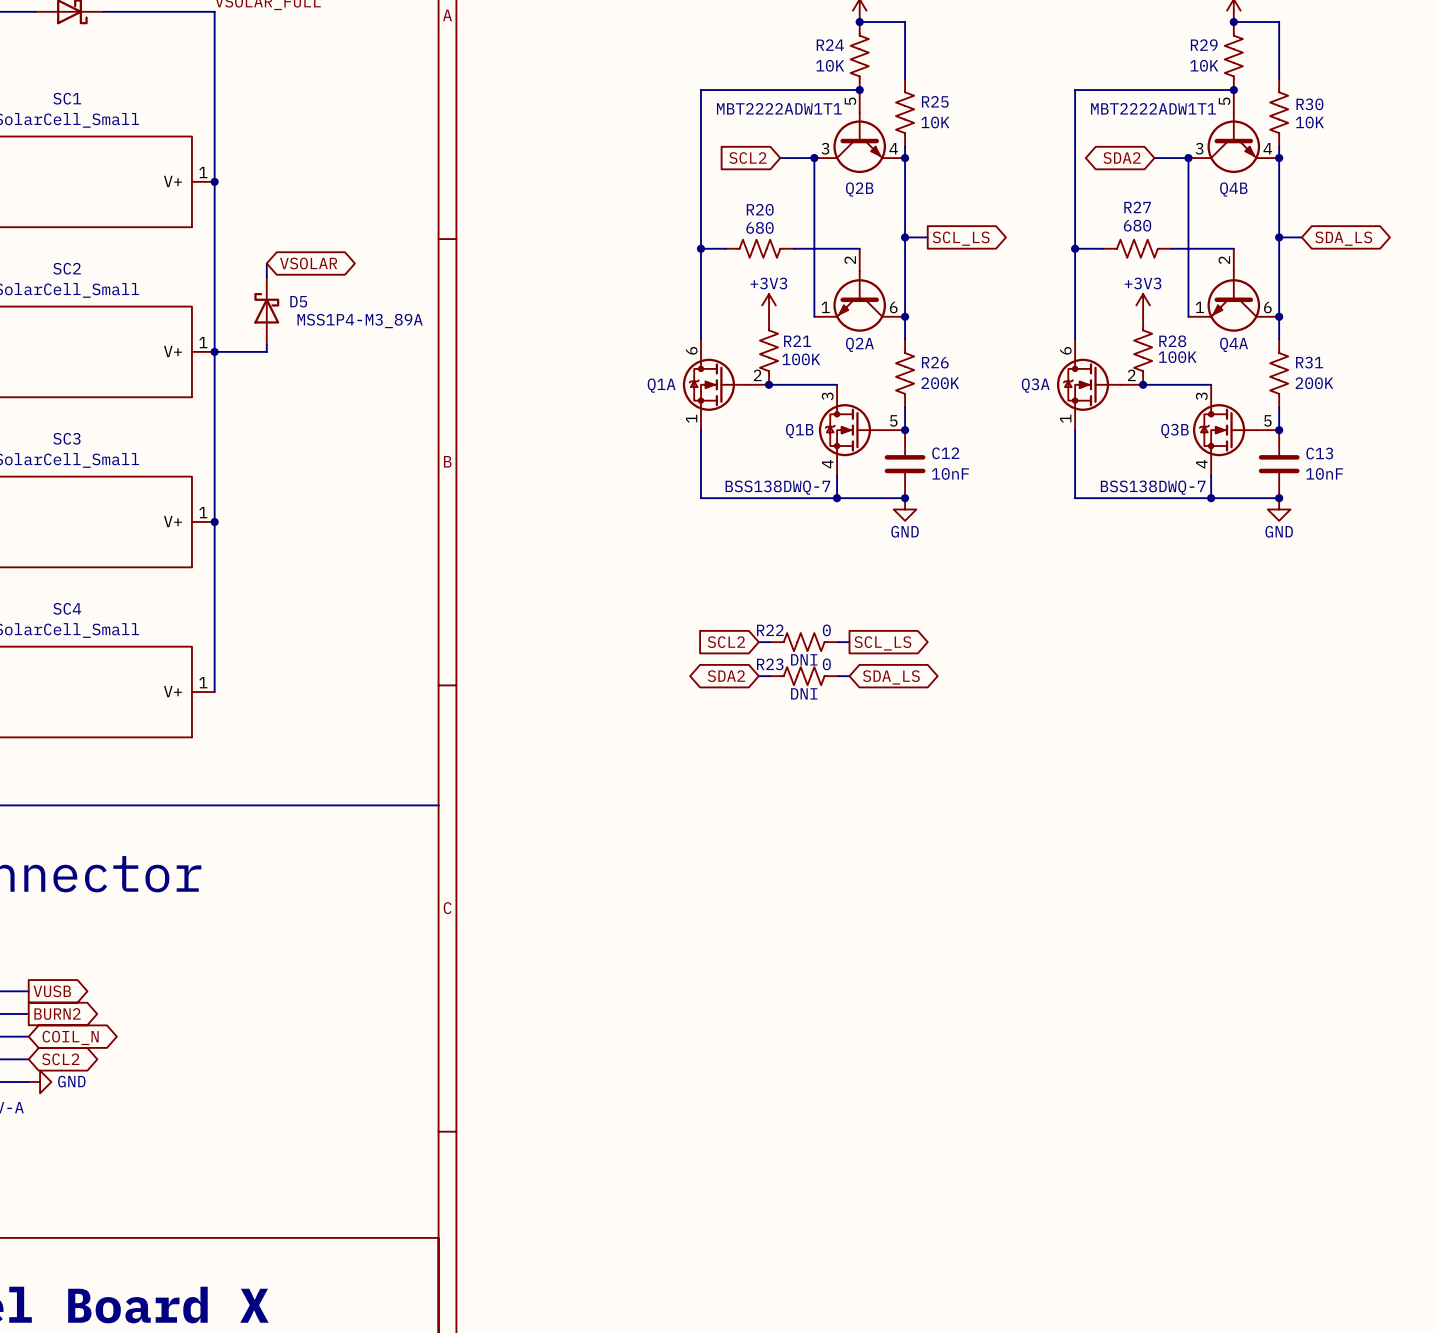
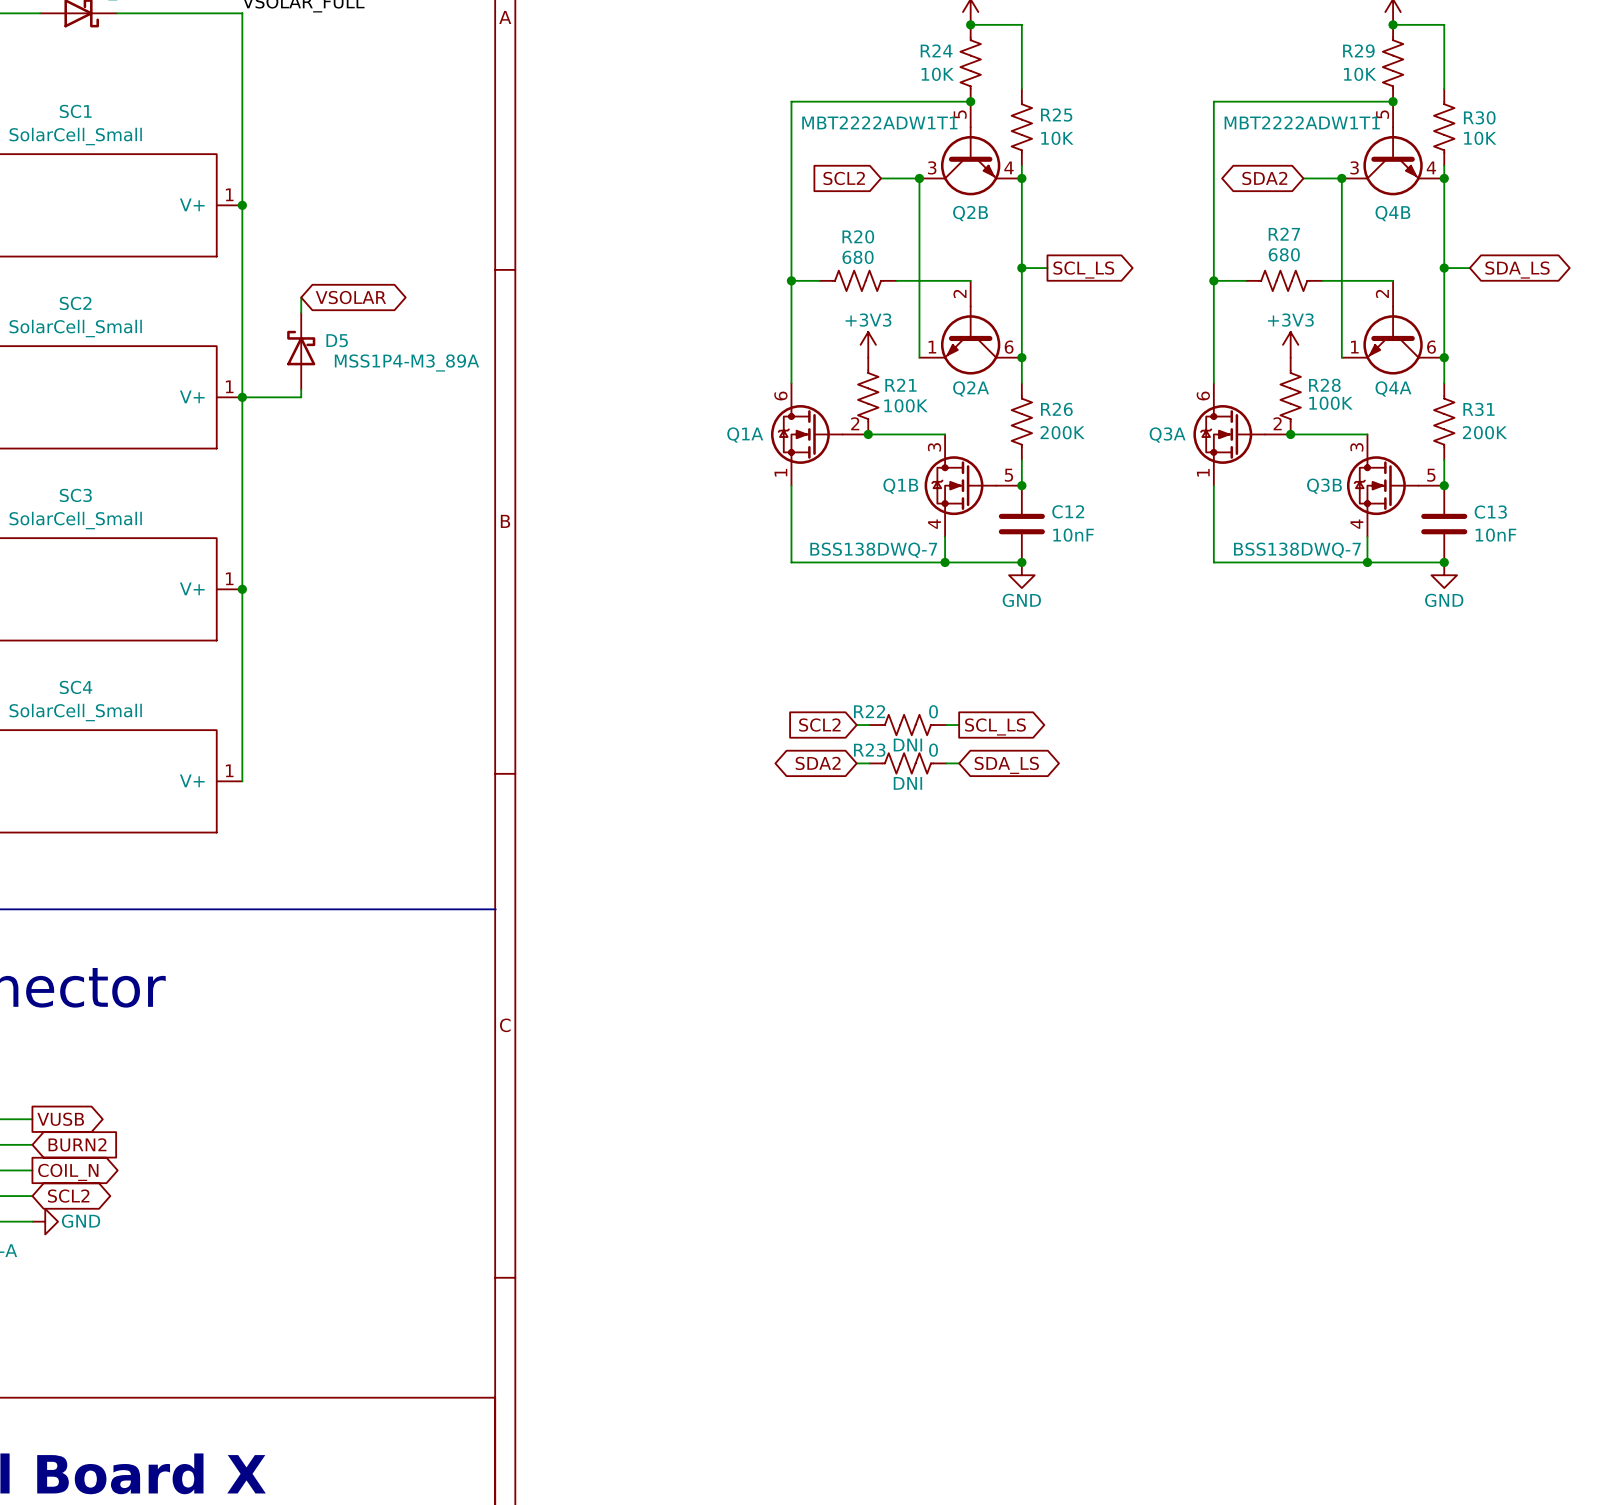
global label shape: output (57, 1013) -> input (77, 1144)
global label shape: bidirectional (70, 1037) -> output (68, 1172)

